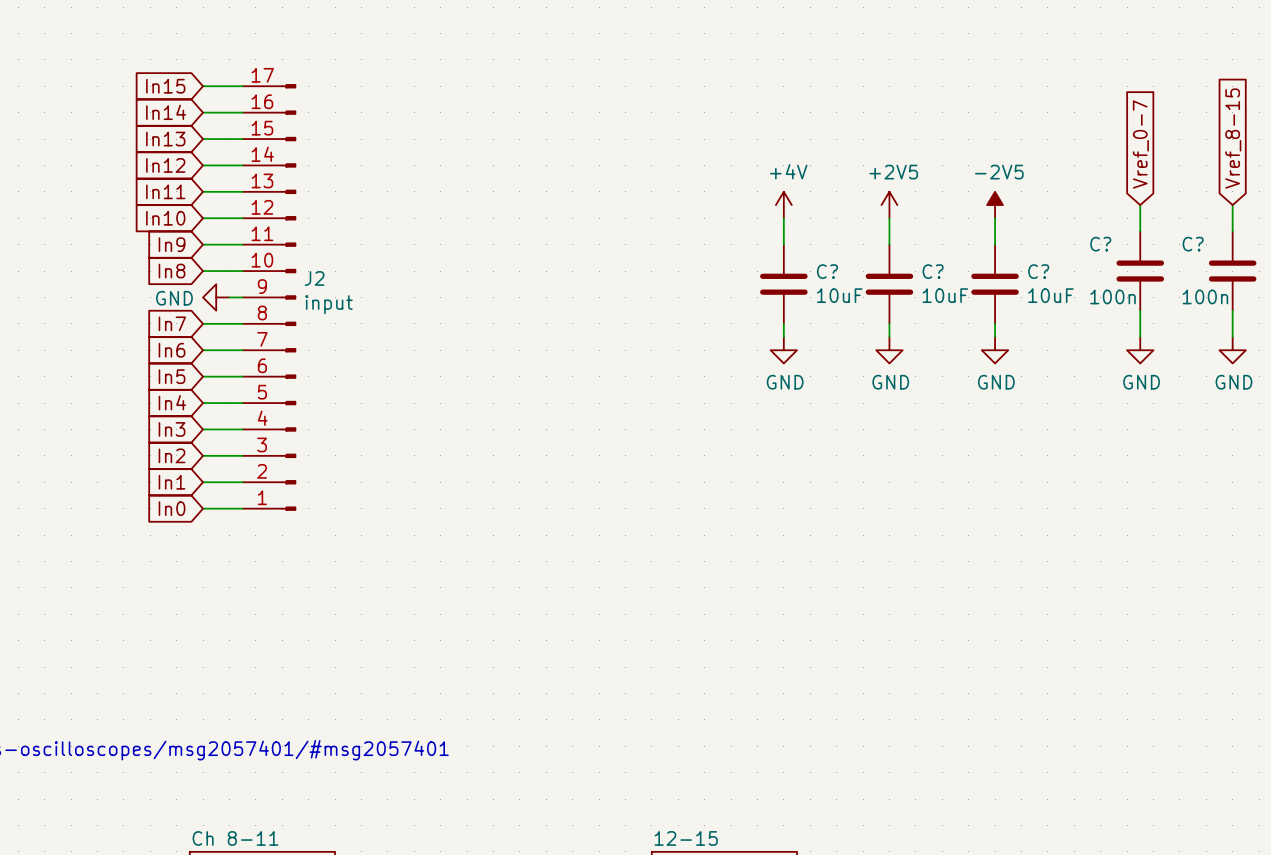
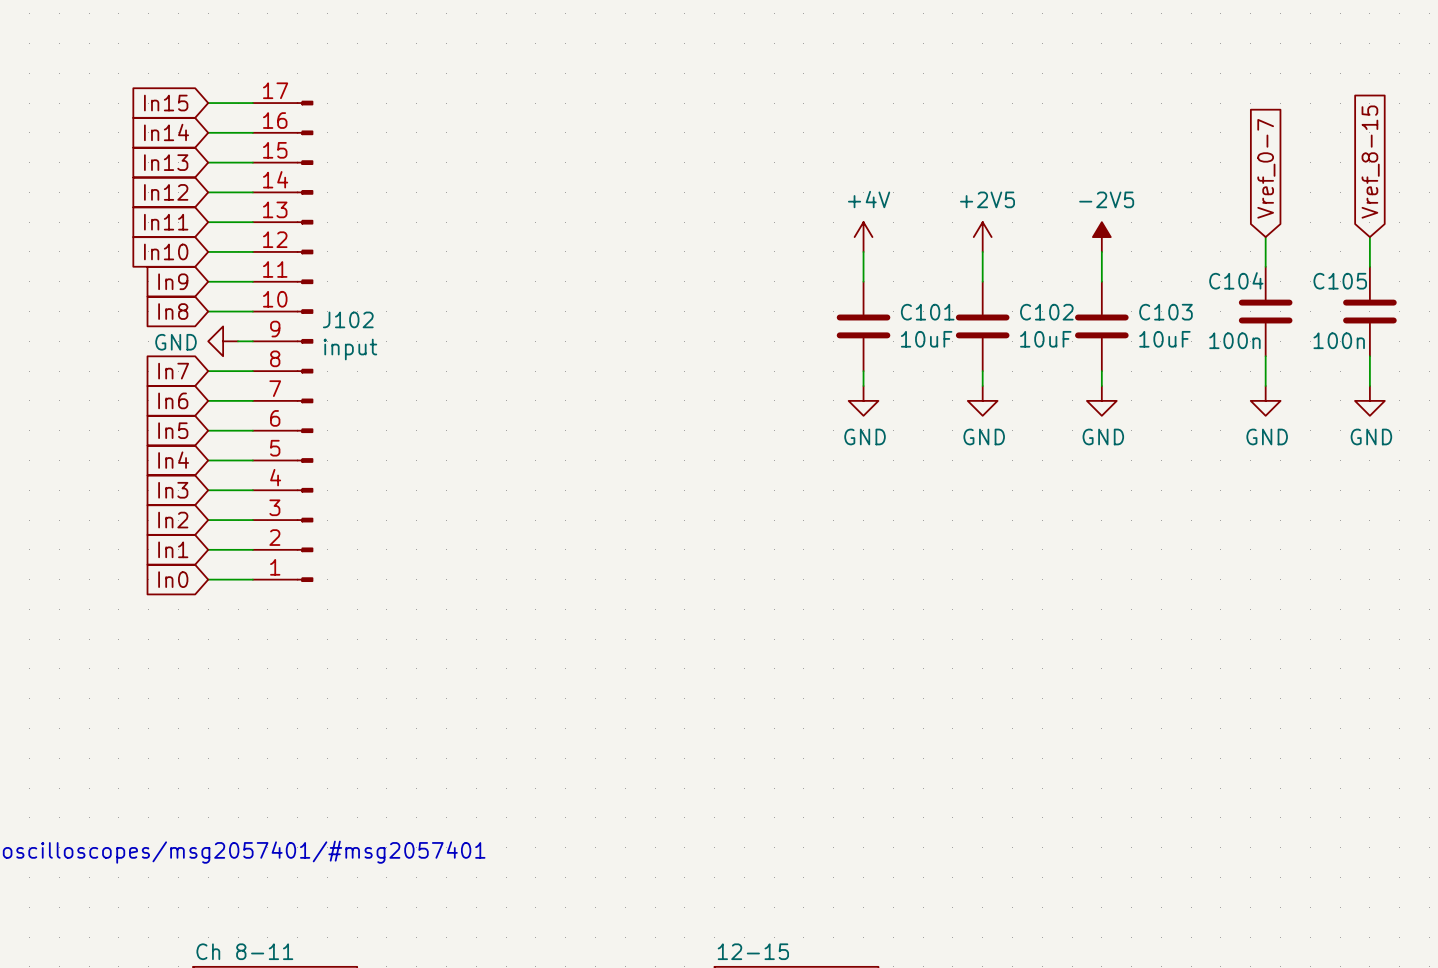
C? name: C? (1100, 244) -> C104 (1236, 280)
C? name: C? (1193, 244) -> C105 (1340, 281)
C? name: C? (827, 271) -> C101 (927, 312)
C? name: C? (933, 271) -> C102 (1046, 312)
C? name: C? (1038, 271) -> C103 (1165, 312)
J2 name: J2 (314, 278) -> J102 (348, 319)

